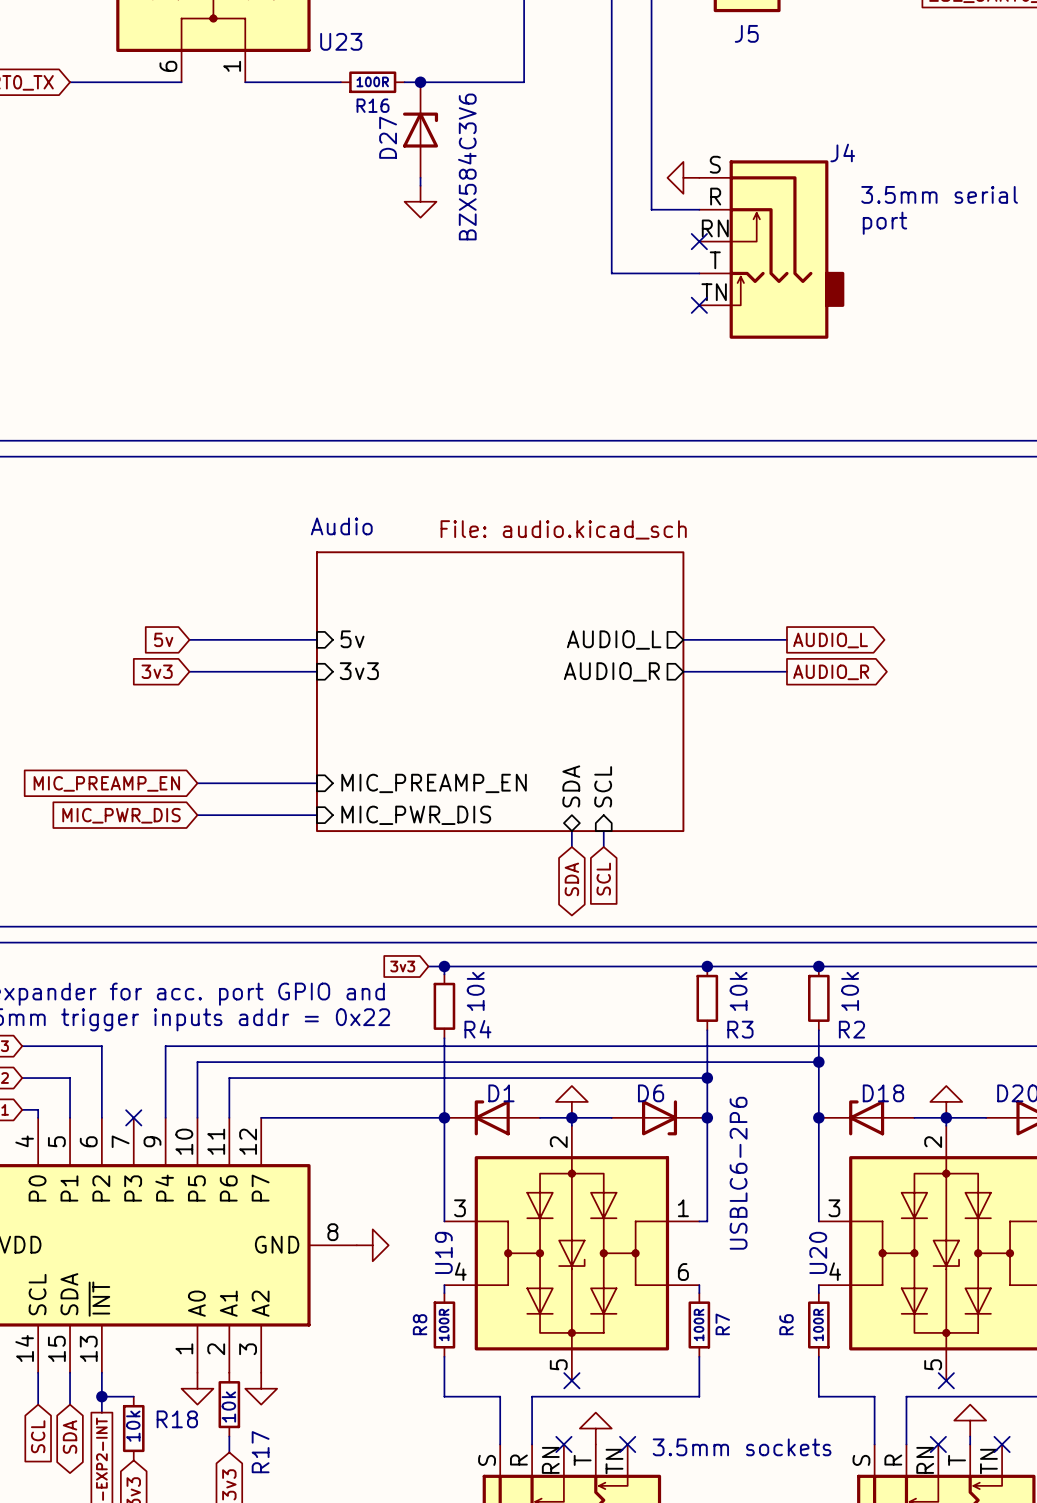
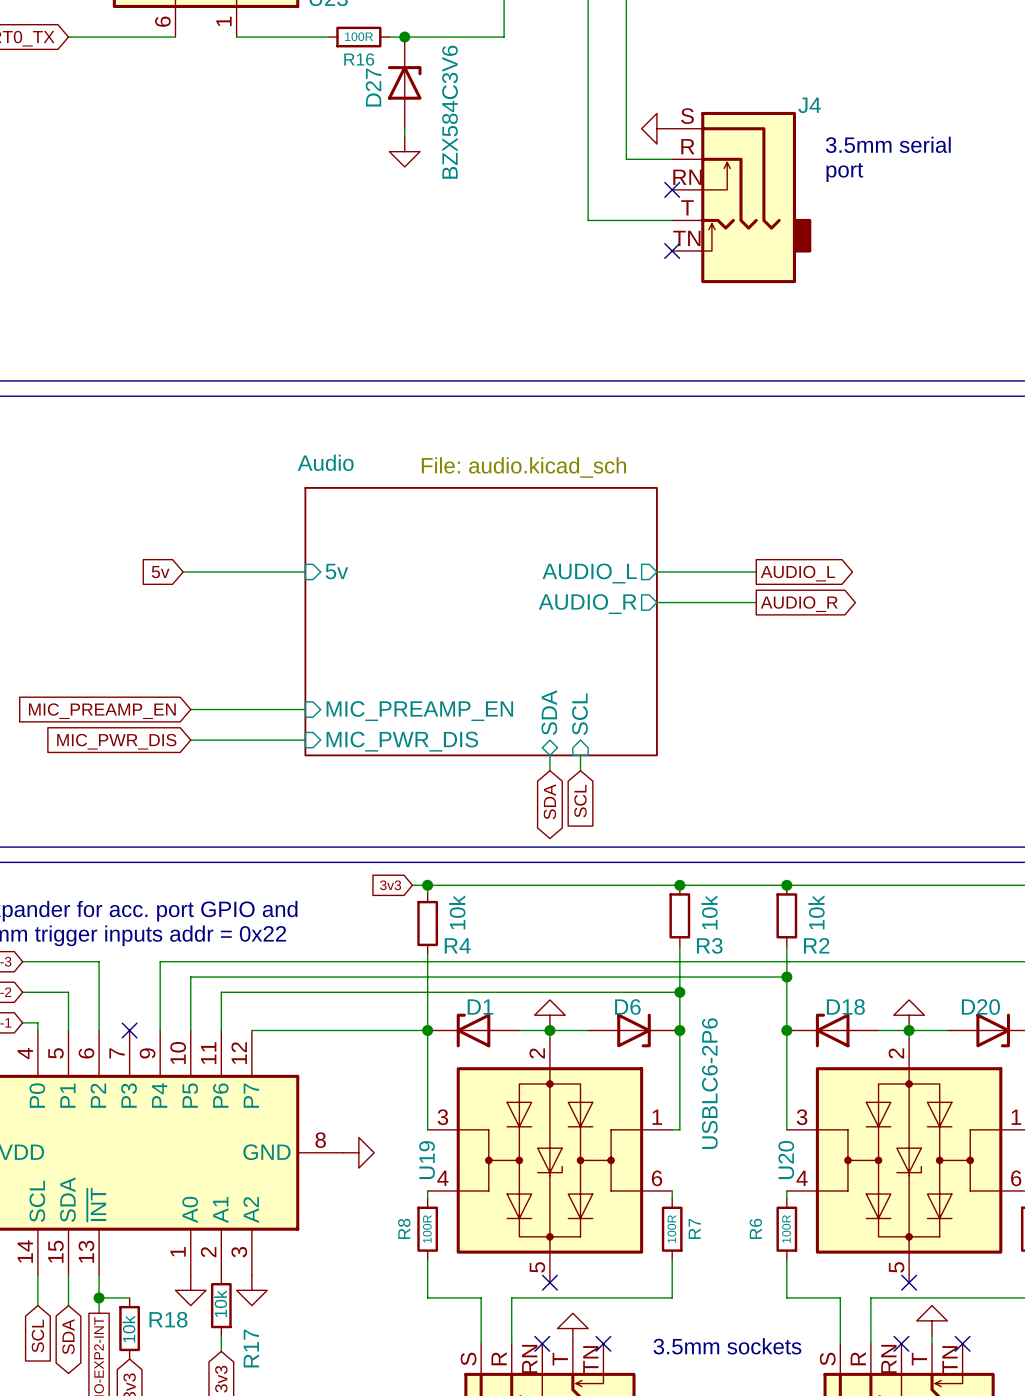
global label: 3v3 (157, 671) -> none
wire: (189, 671) (316, 671) -> none
sheet pin: 3v3 (359, 671) -> none

